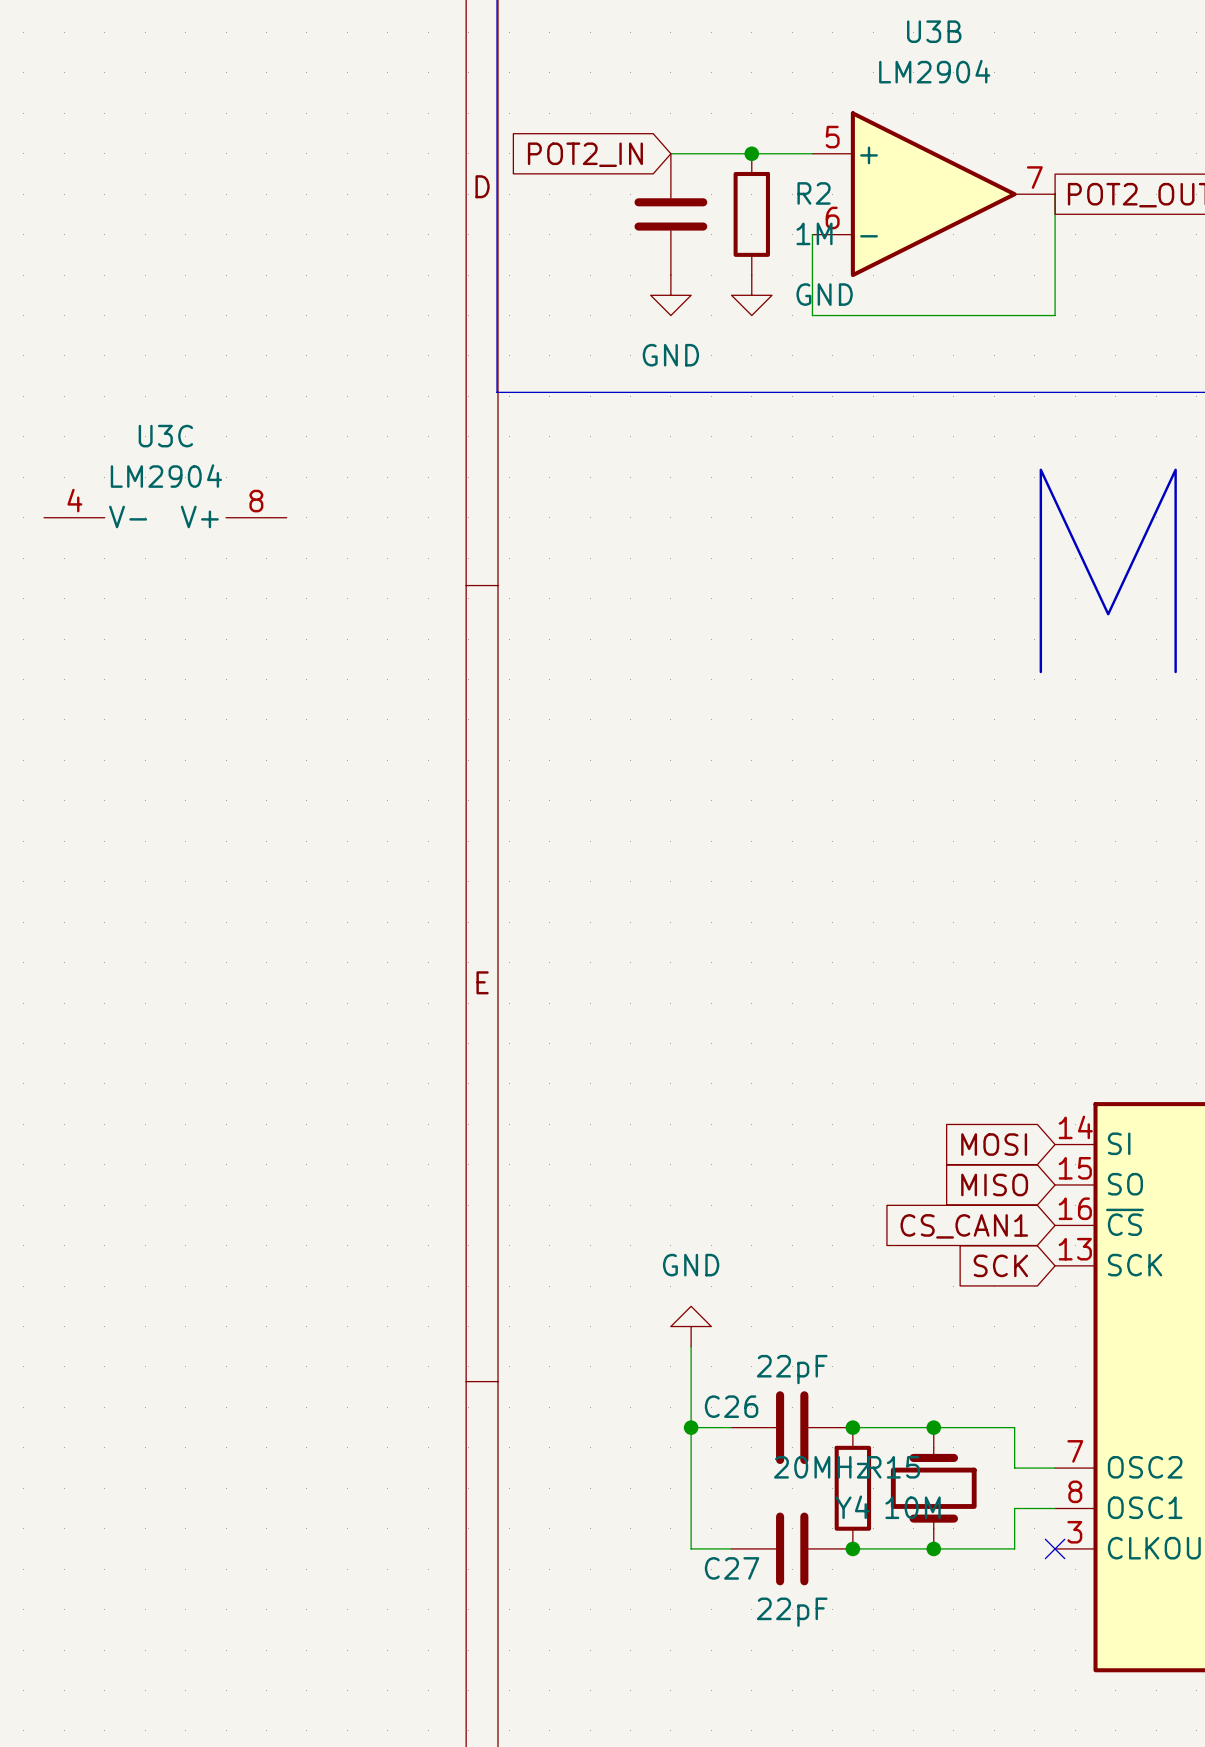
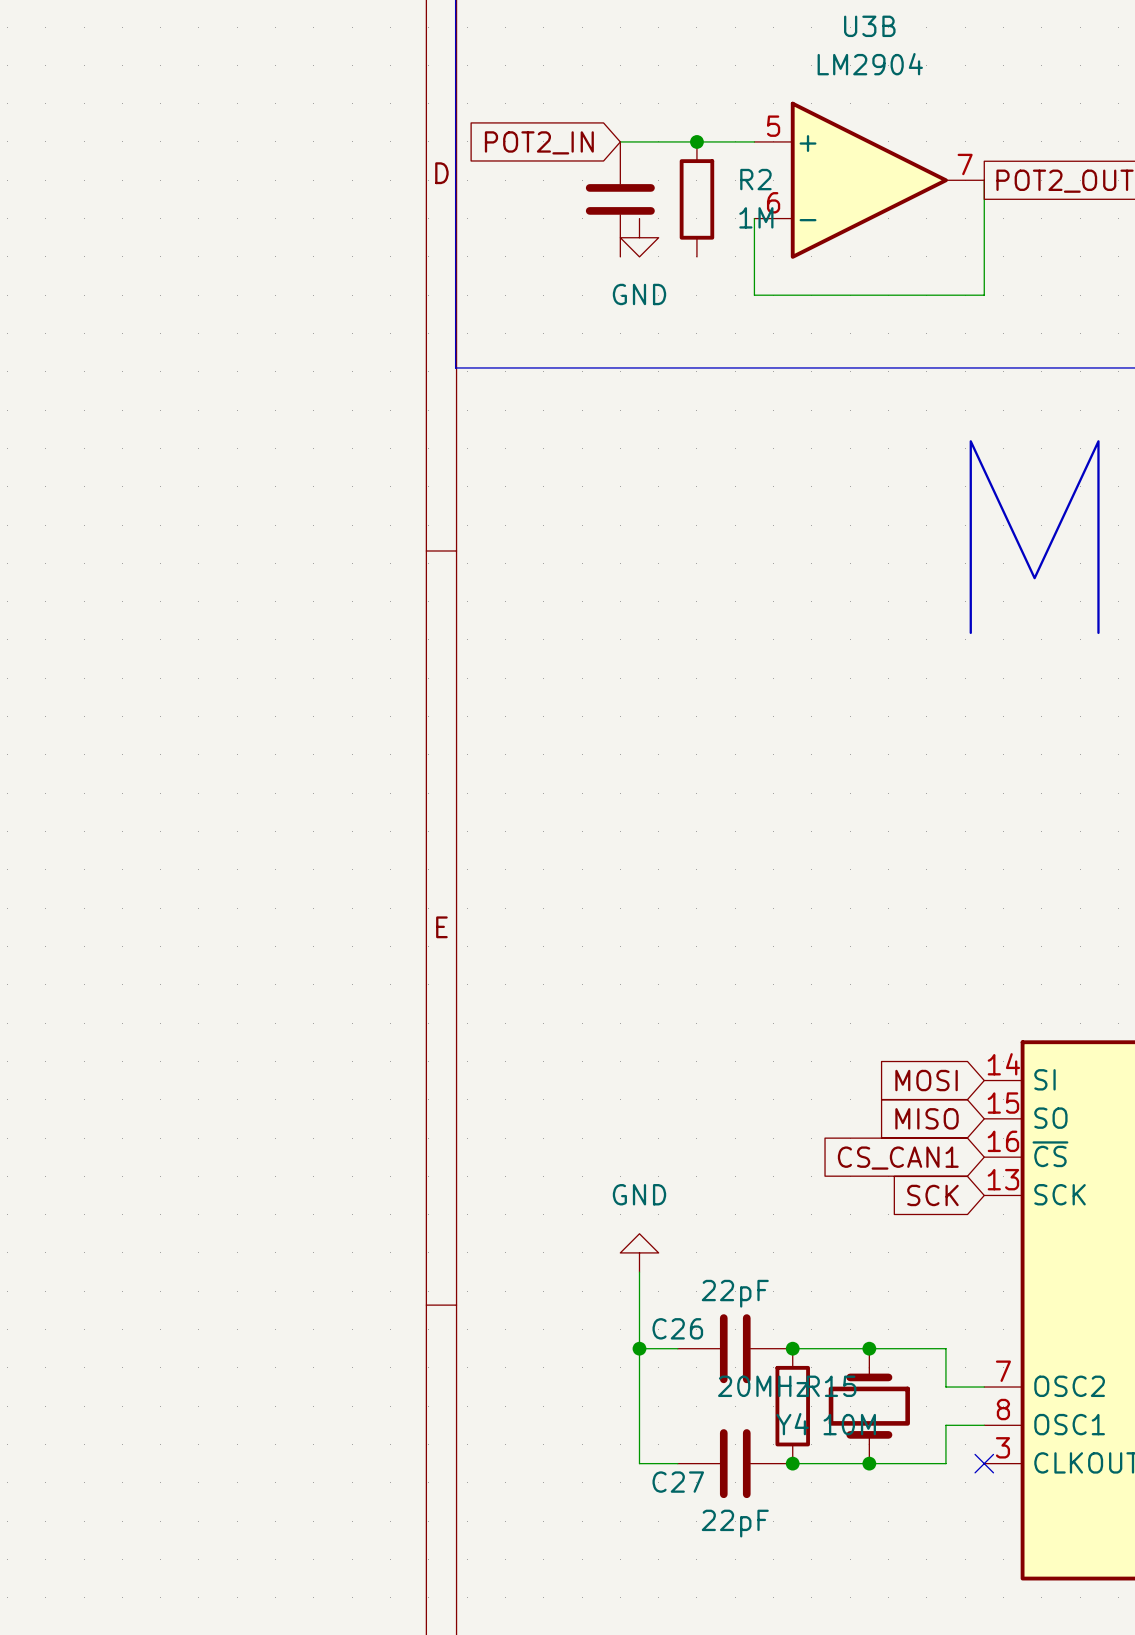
power symbol: none -> GND (639, 237)
power symbol: GND (670, 295) -> none
power symbol: GND (751, 295) -> none
U3C: LM2904 (165, 517) -> none

